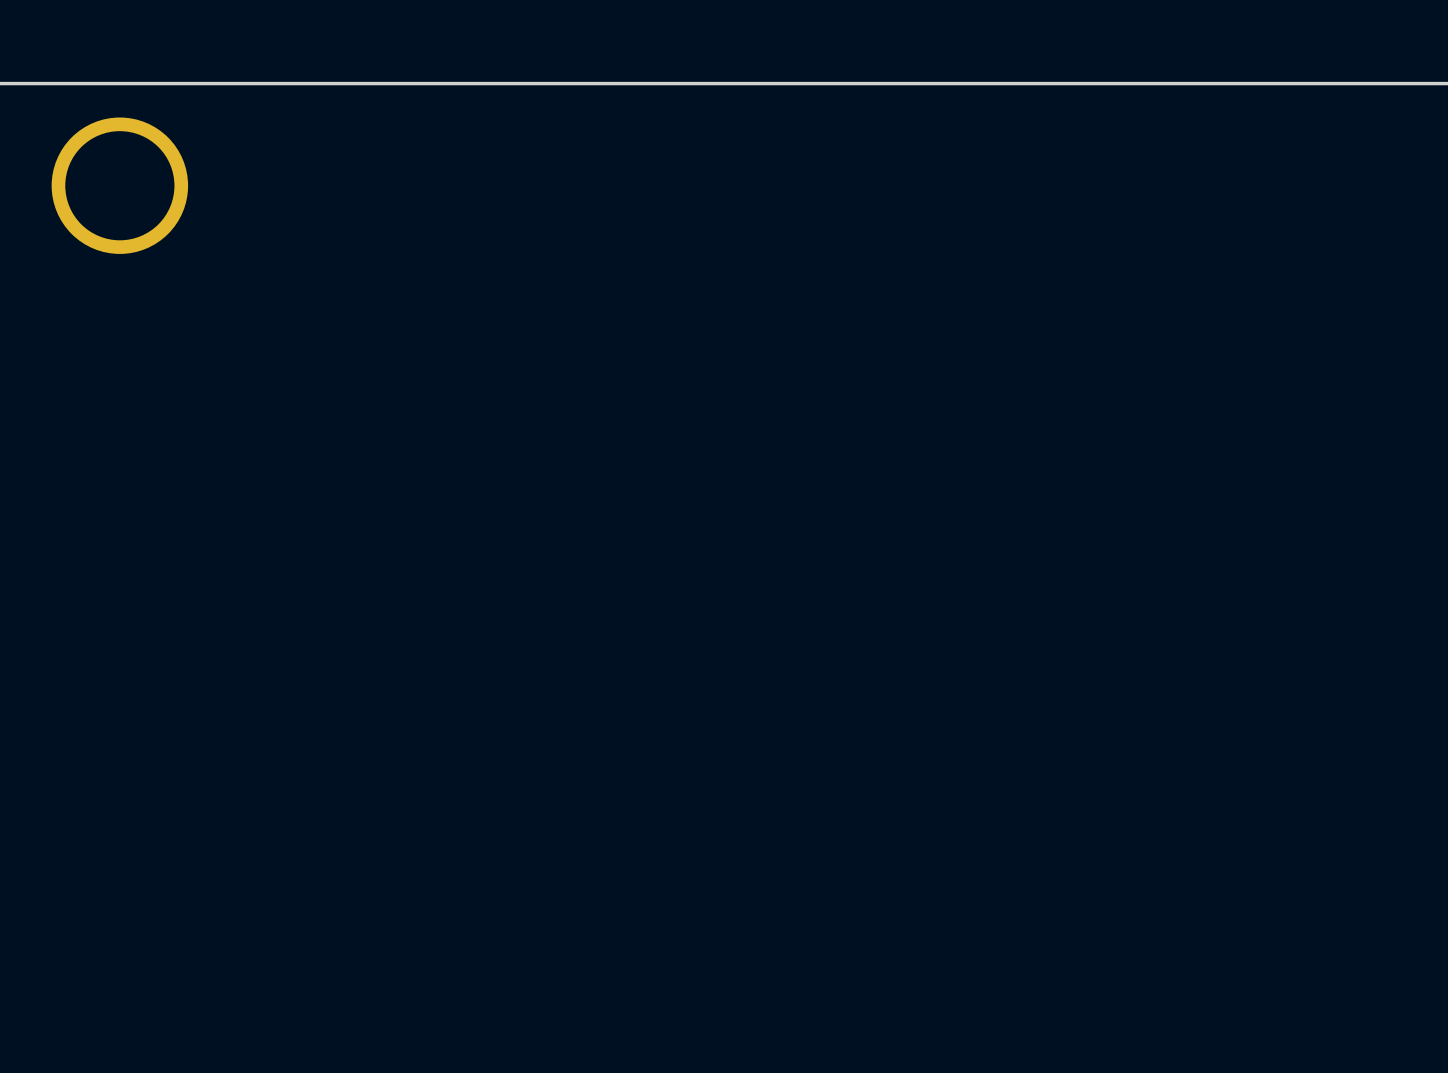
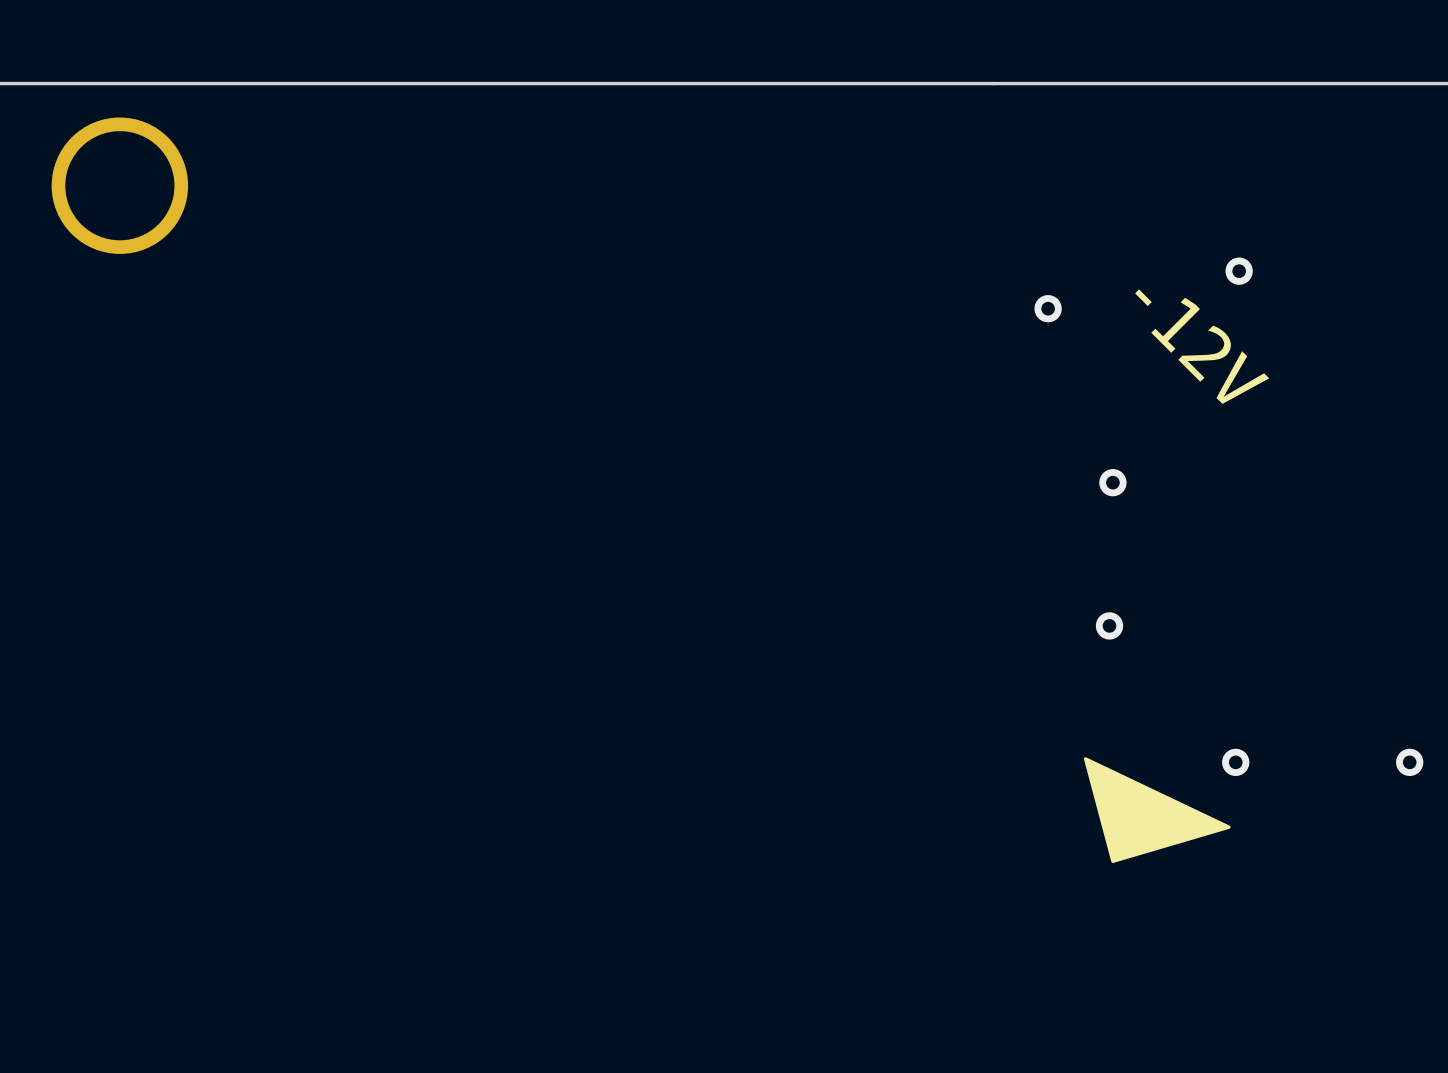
via: none -> (1239, 271)
via: none -> (1048, 308)
text: none -> -12V (1202, 346)
via: none -> (1112, 482)
via: none -> (1109, 625)
drawing: none -> [1083, 757, 1231, 864]
via: none -> (1235, 762)
via: none -> (1409, 762)

